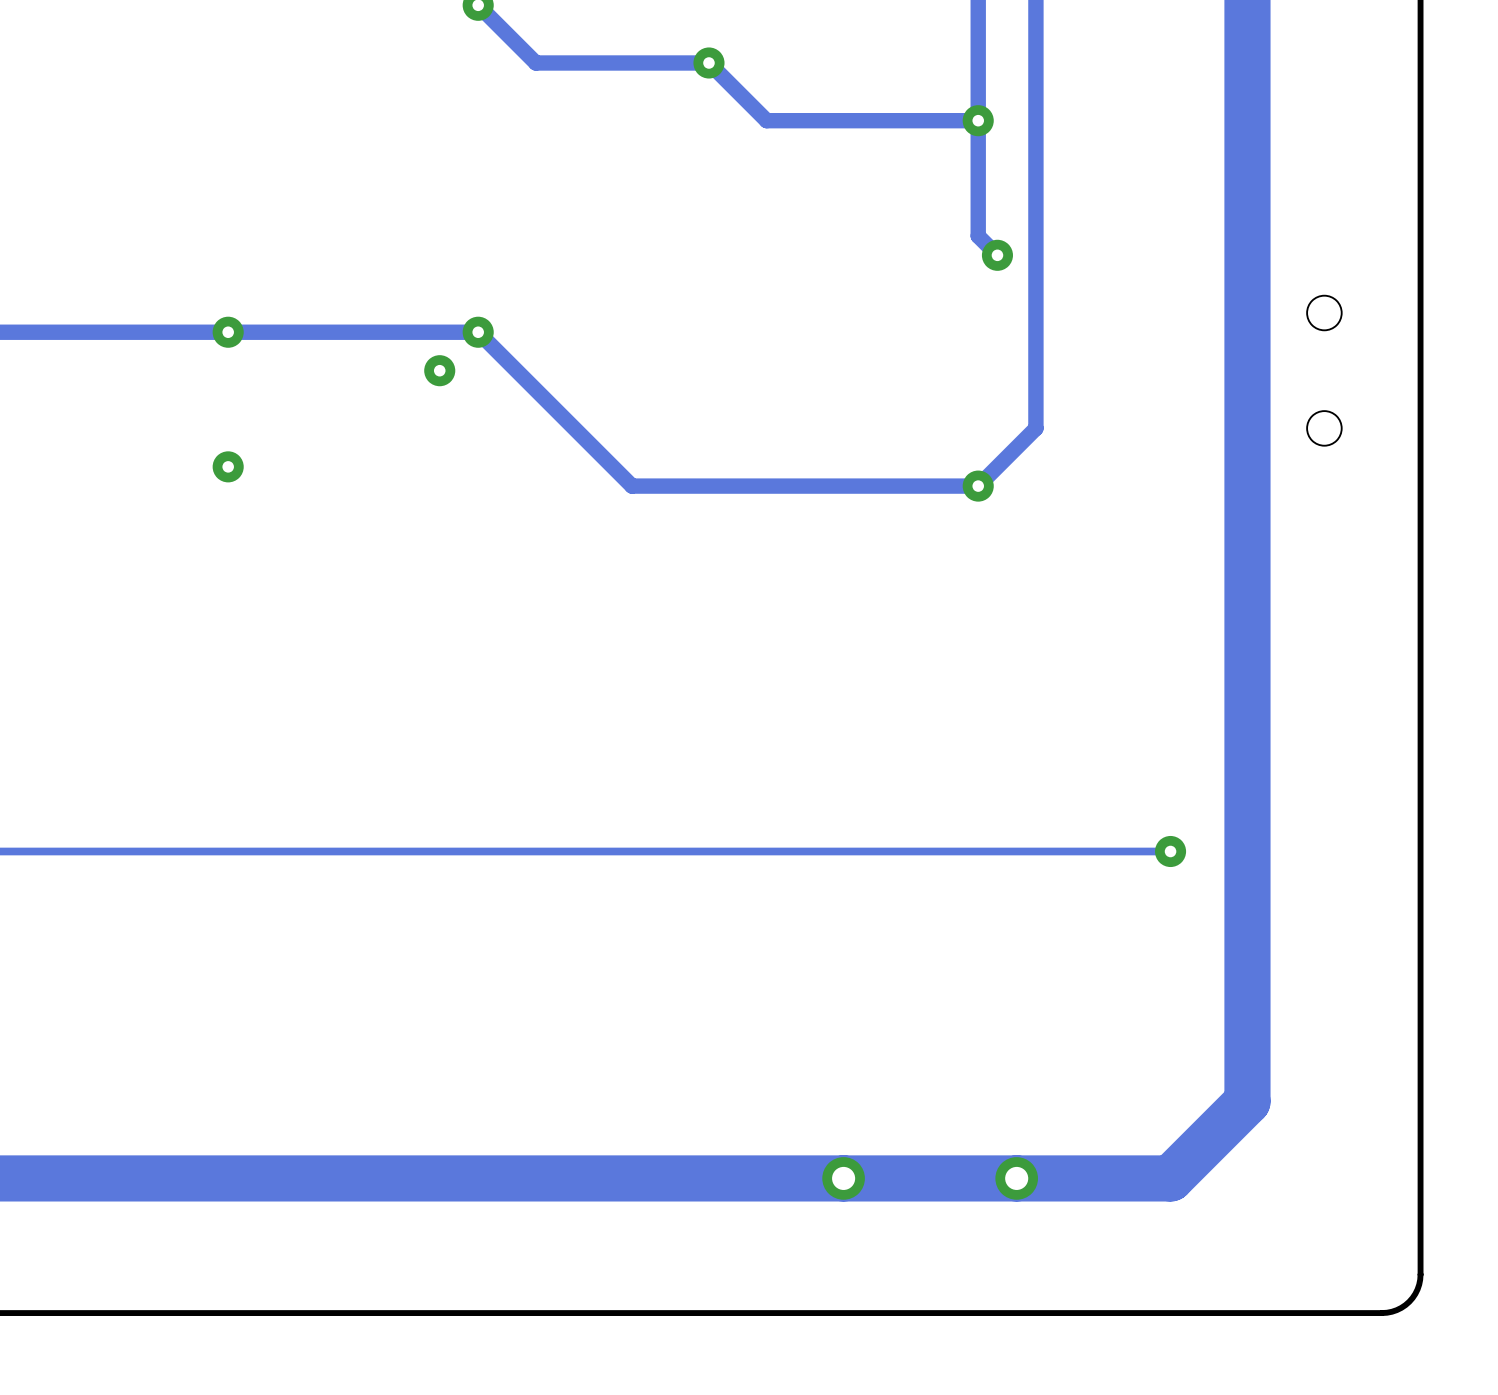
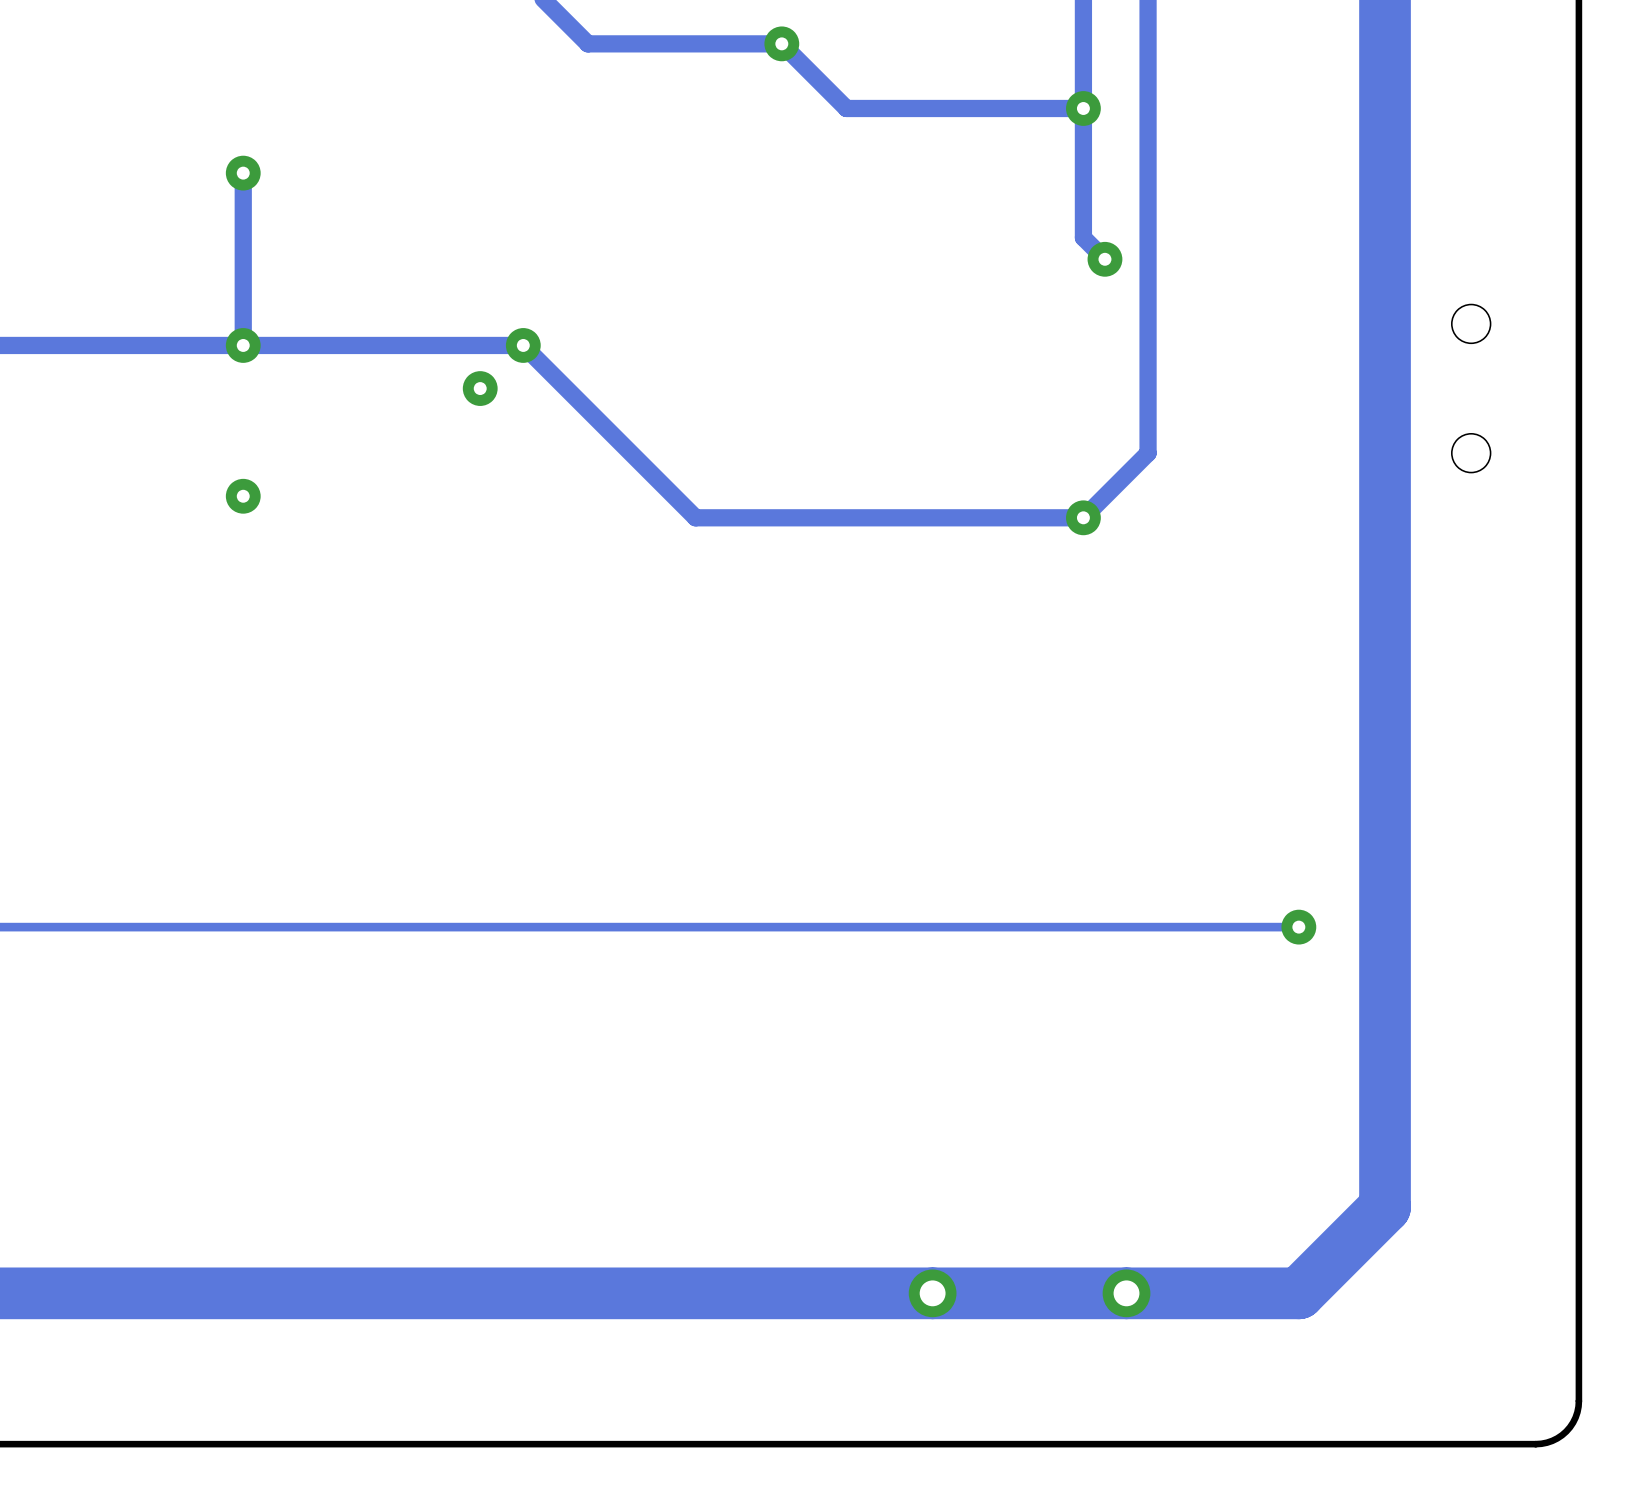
track: none -> (243, 173) (243, 345)
via: none -> (243, 173)

